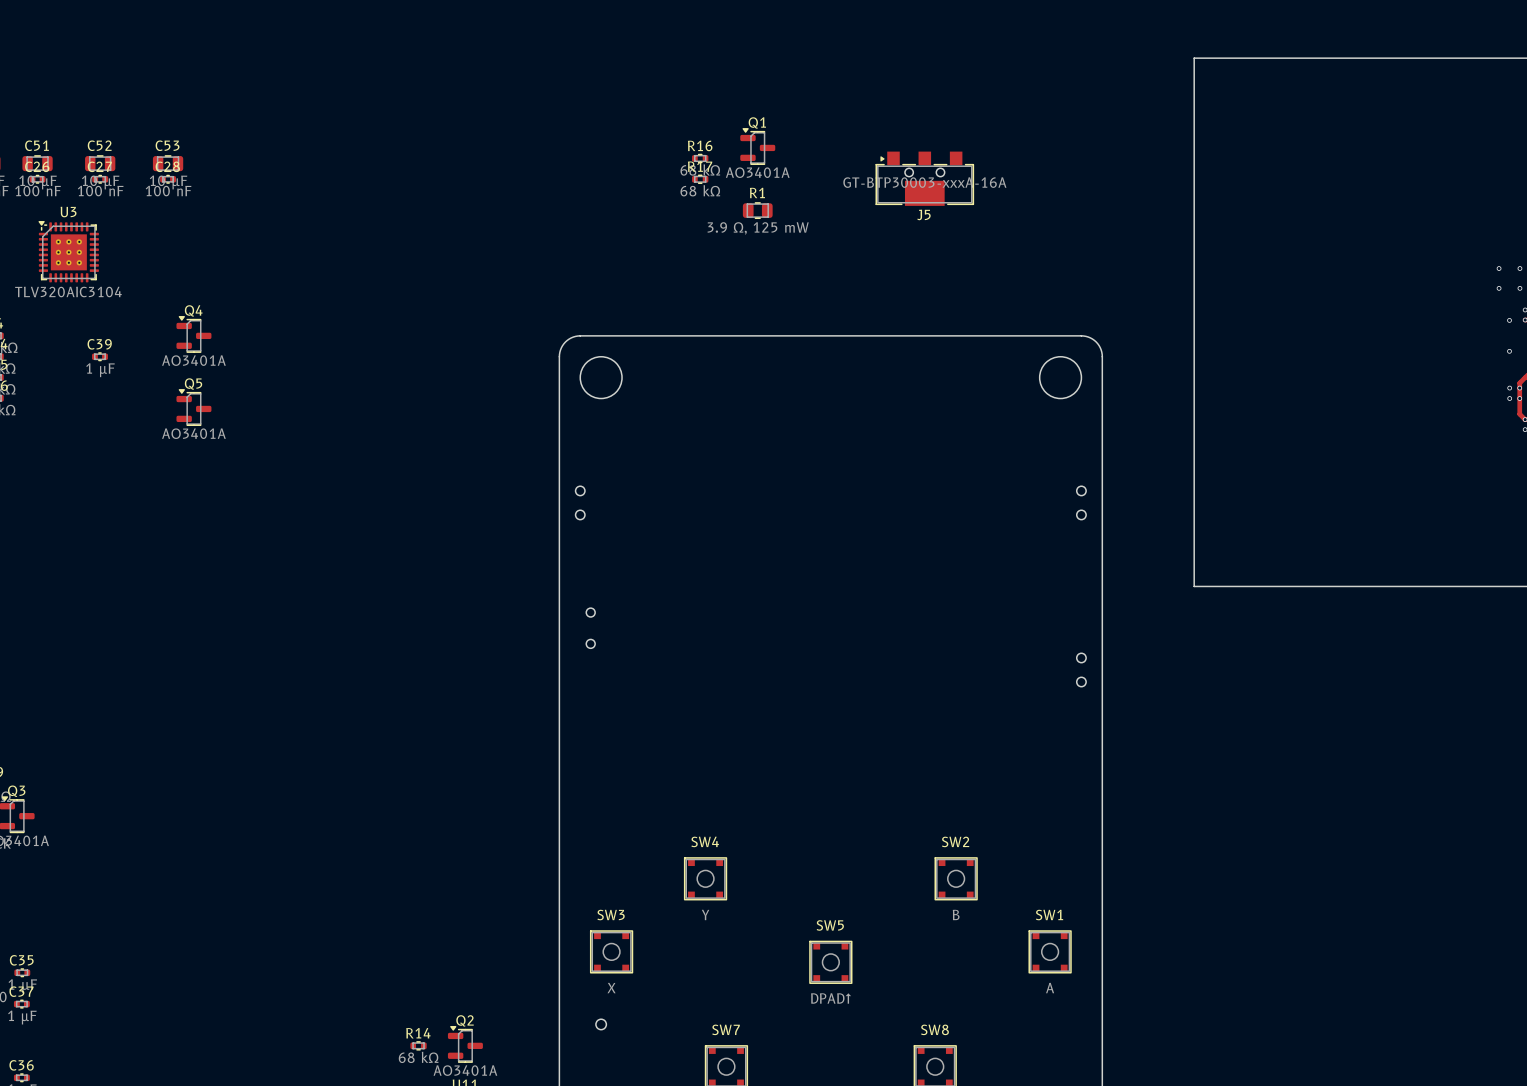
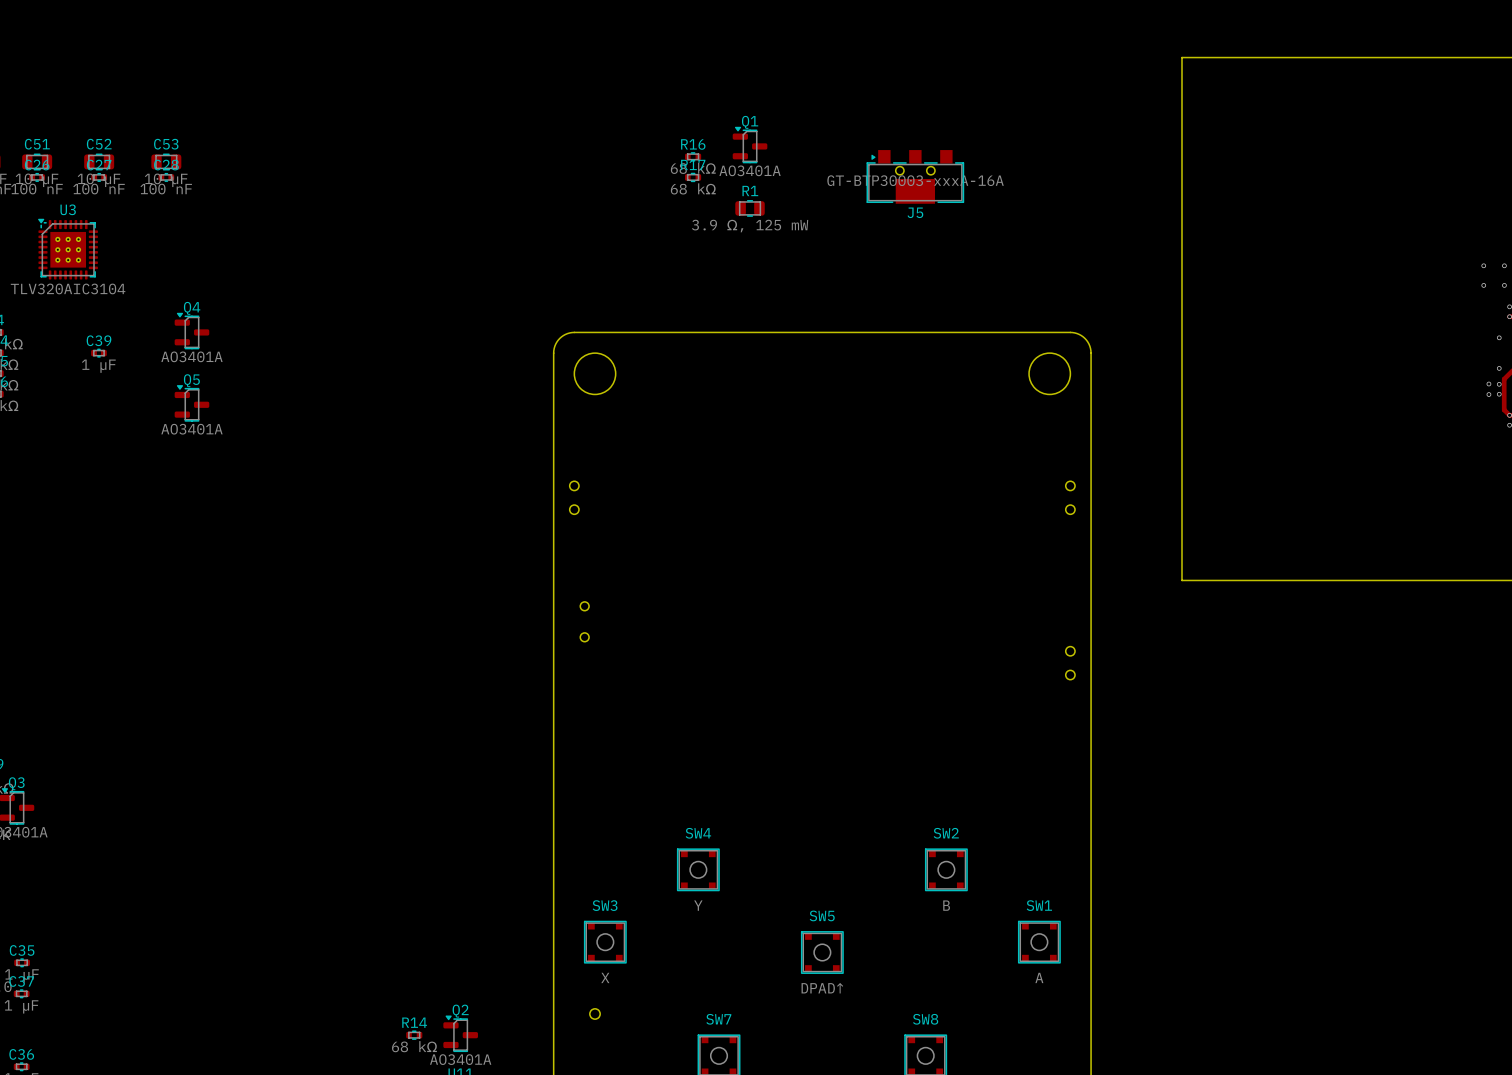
via: (1509, 320) -> none
via: none -> (1499, 337)
via: (1509, 351) -> none
via: none -> (1499, 368)
via: none -> (1488, 384)
via: (1509, 388) -> none
via: none -> (1499, 384)
via: (1519, 388) -> none
via: none -> (1488, 394)
via: (1509, 398) -> none
via: none -> (1499, 394)
via: (1519, 398) -> none

